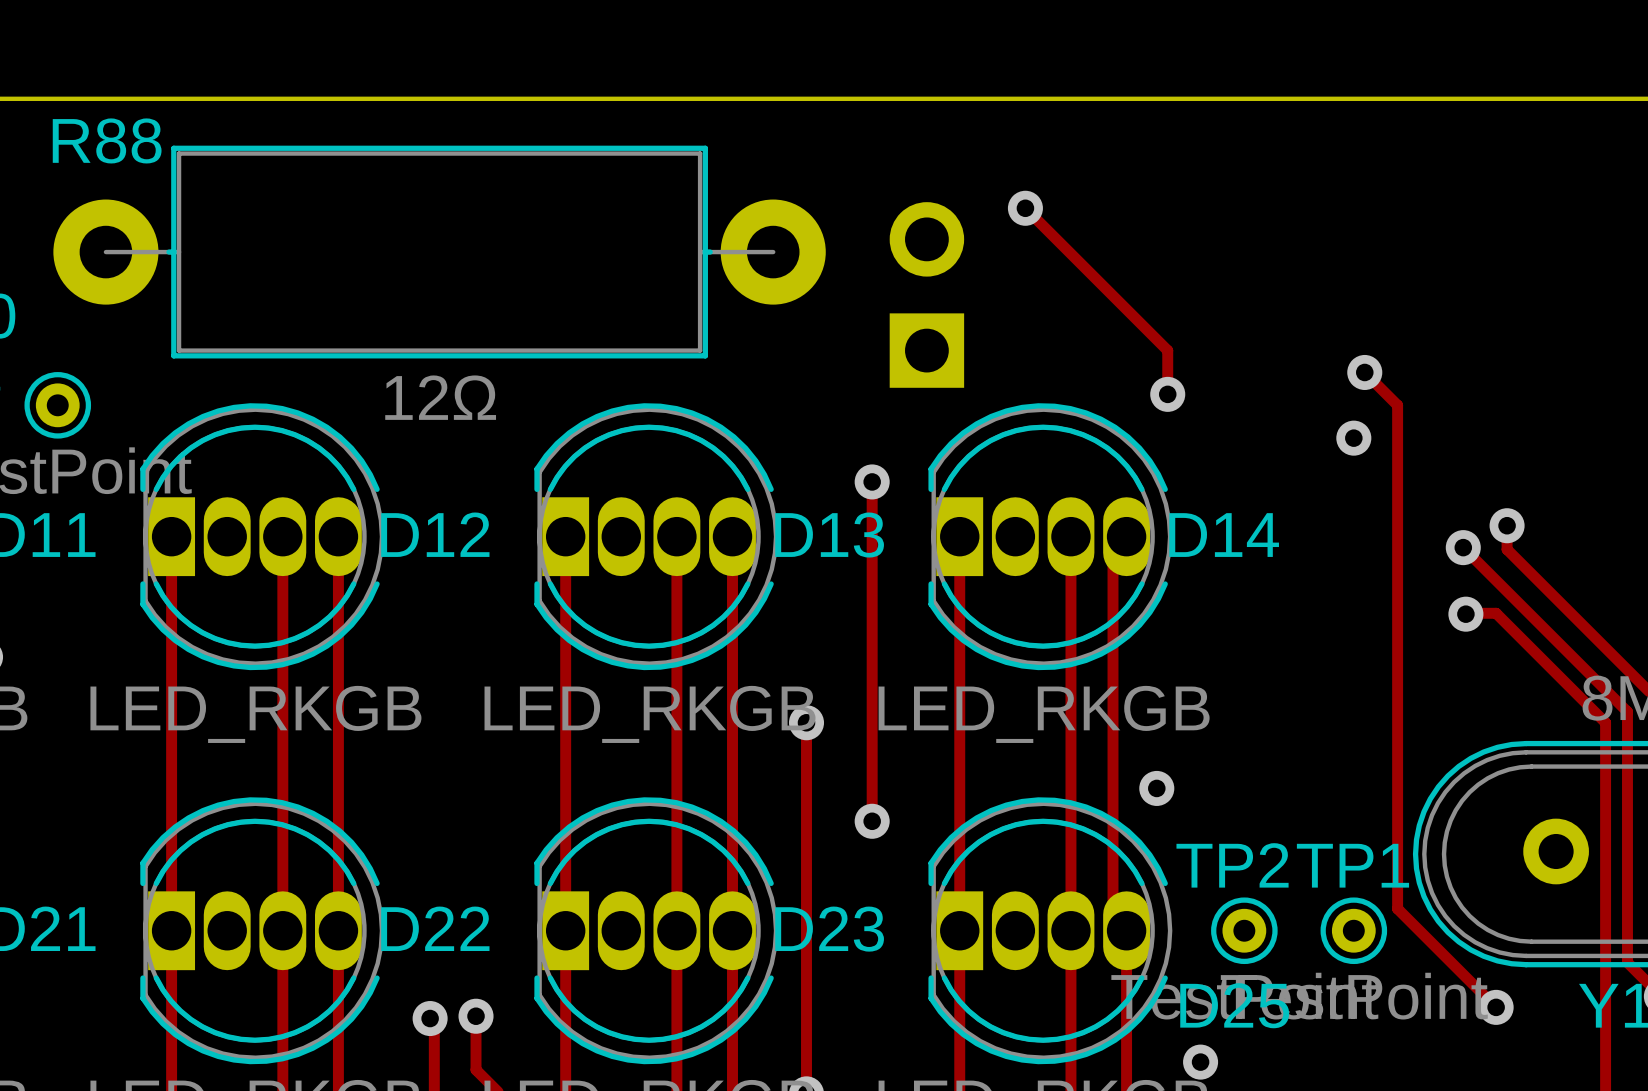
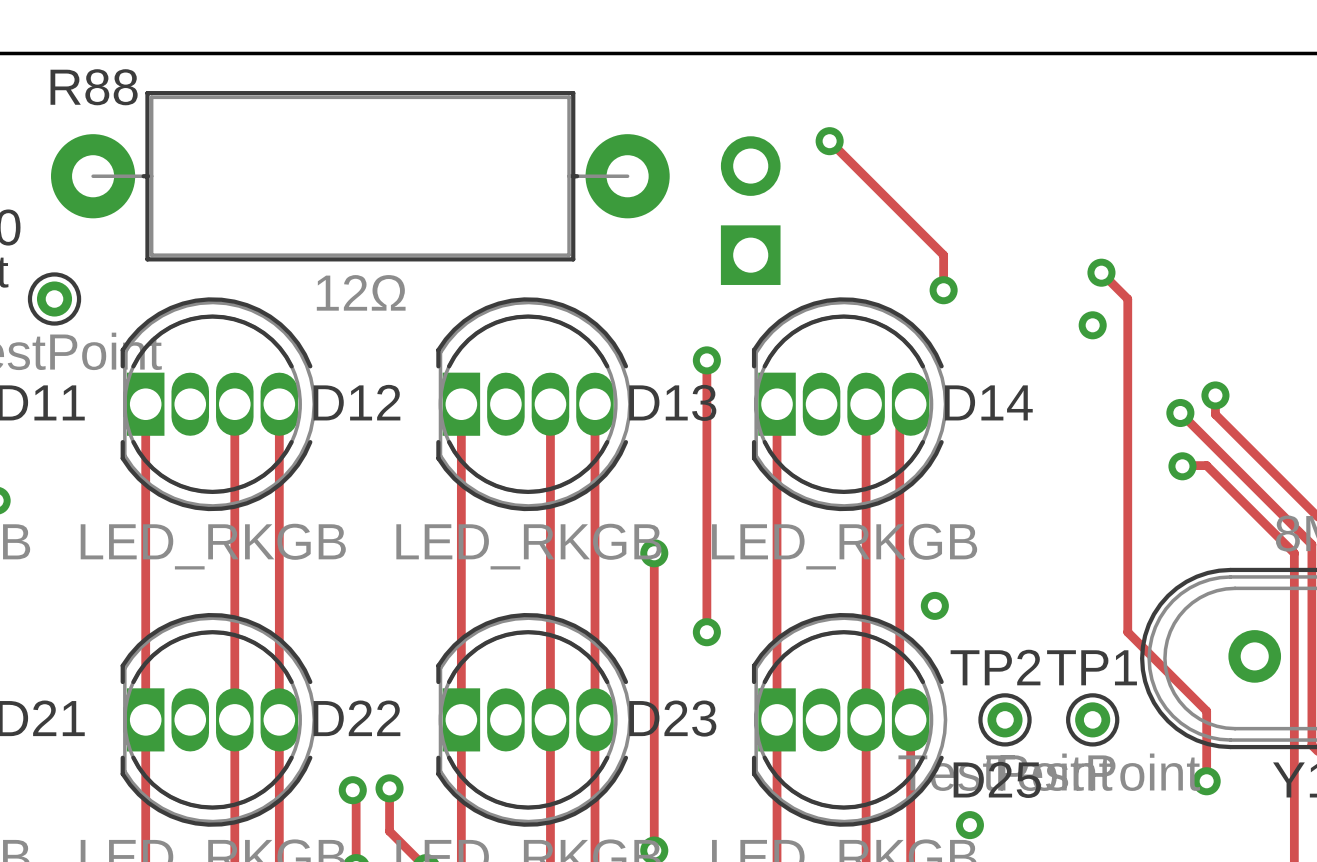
track: (1397, 821) (1397, 908) (1496, 1007) -> (1127, 632) (1206, 711) (1206, 781)

